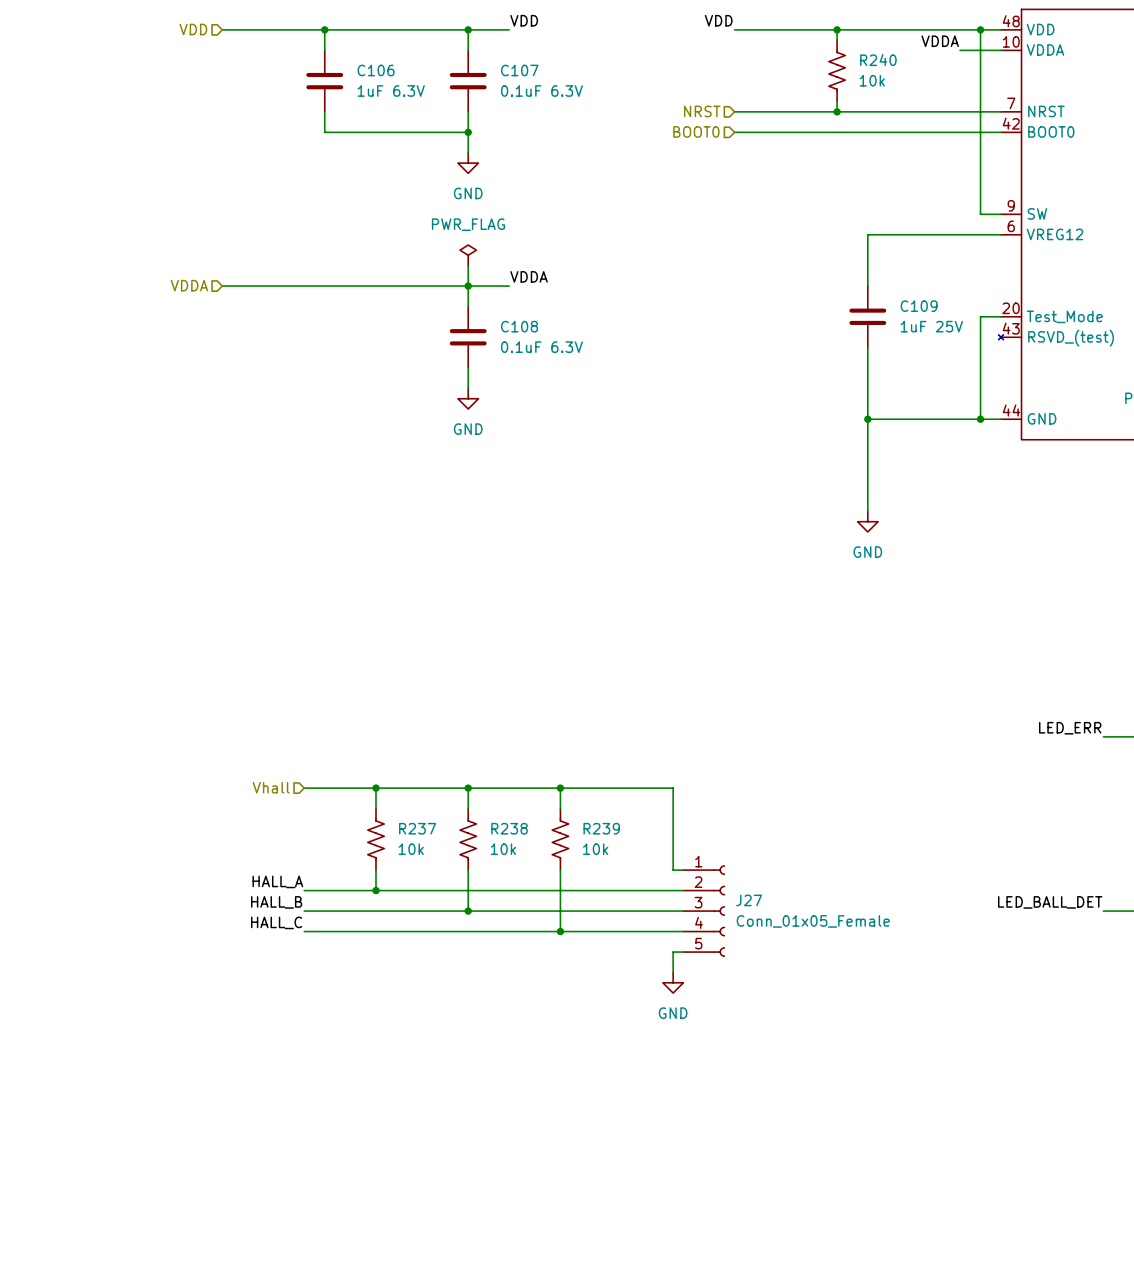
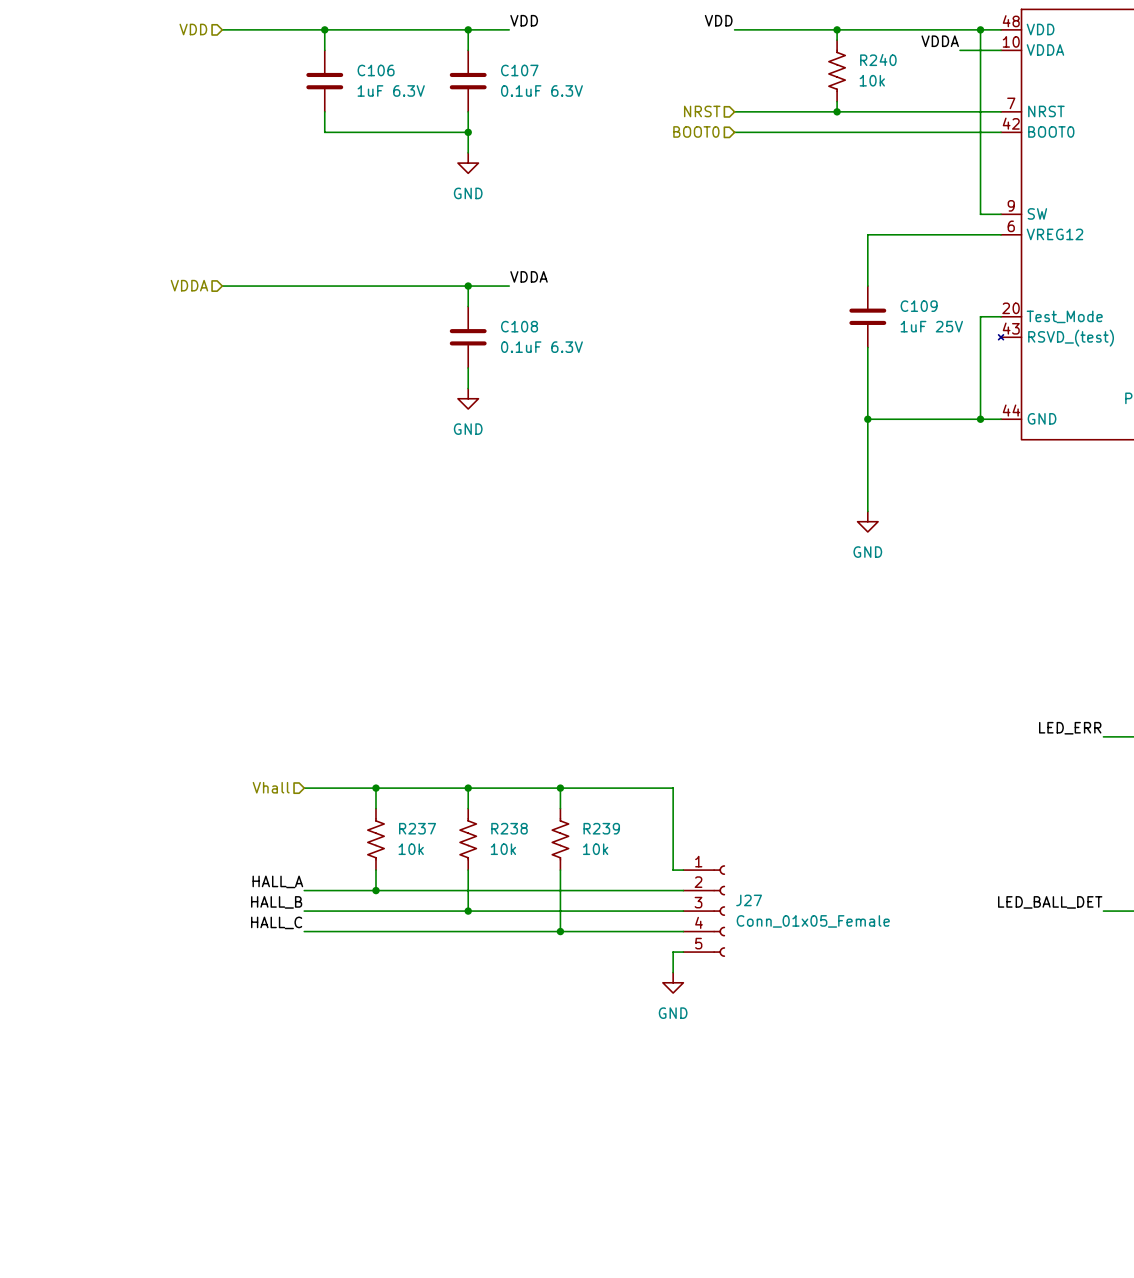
power symbol: PWR_FLAG (468, 255) -> none
wire: (468, 265) (468, 286) -> none

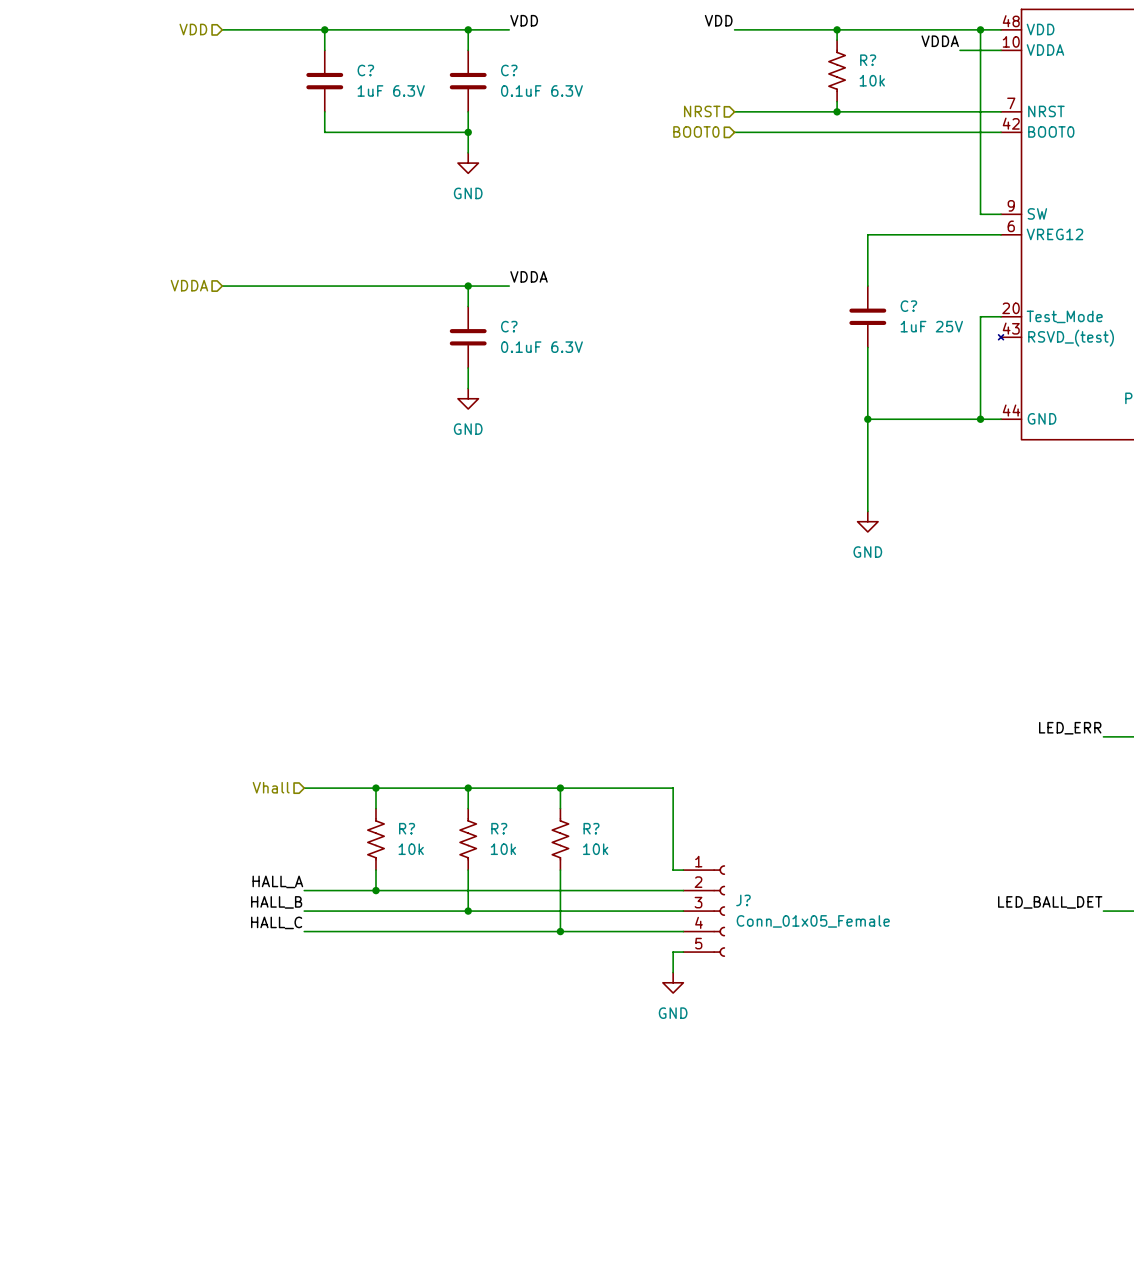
R240 name: R240 (878, 59) -> R? (868, 60)
C106 name: C106 (376, 70) -> C? (365, 70)
C107 name: C107 (519, 70) -> C? (509, 70)
C109 name: C109 (919, 306) -> C? (908, 306)
C108 name: C108 (519, 326) -> C? (509, 326)
R237 name: R237 (417, 828) -> R? (407, 828)
R238 name: R238 (509, 828) -> R? (499, 828)
R239 name: R239 (601, 828) -> R? (591, 828)
J27 name: J27 (749, 900) -> J? (743, 900)

